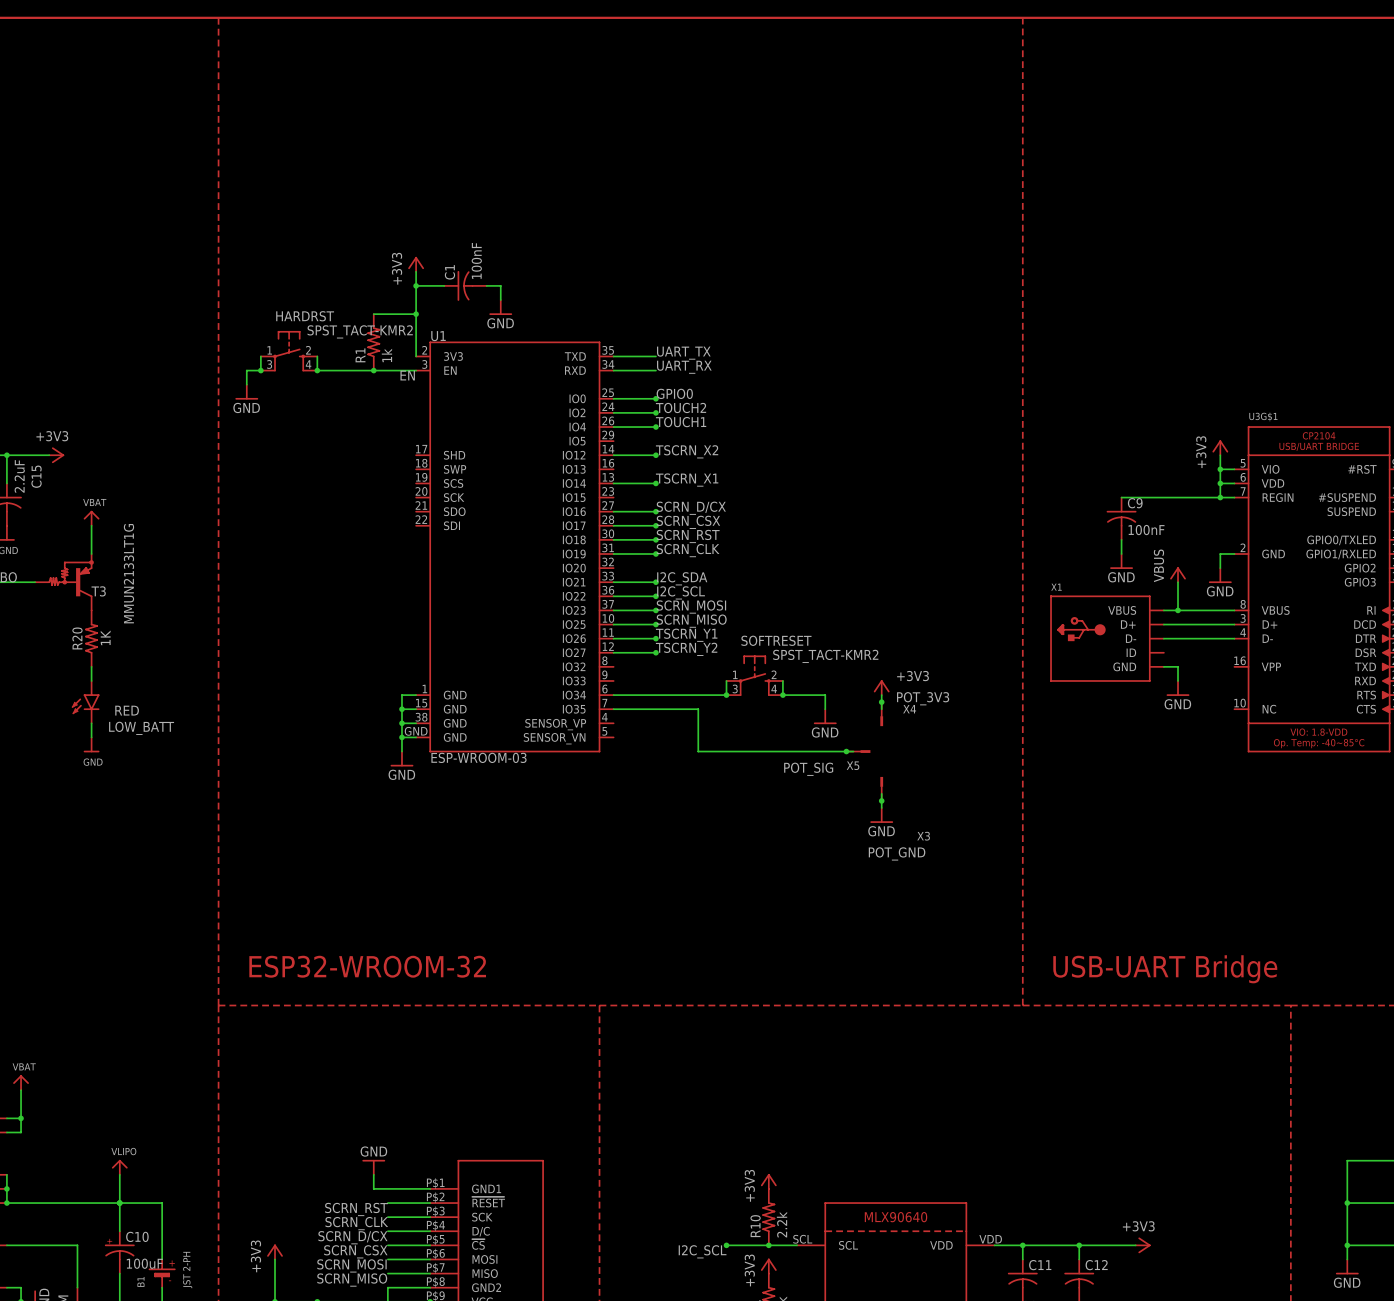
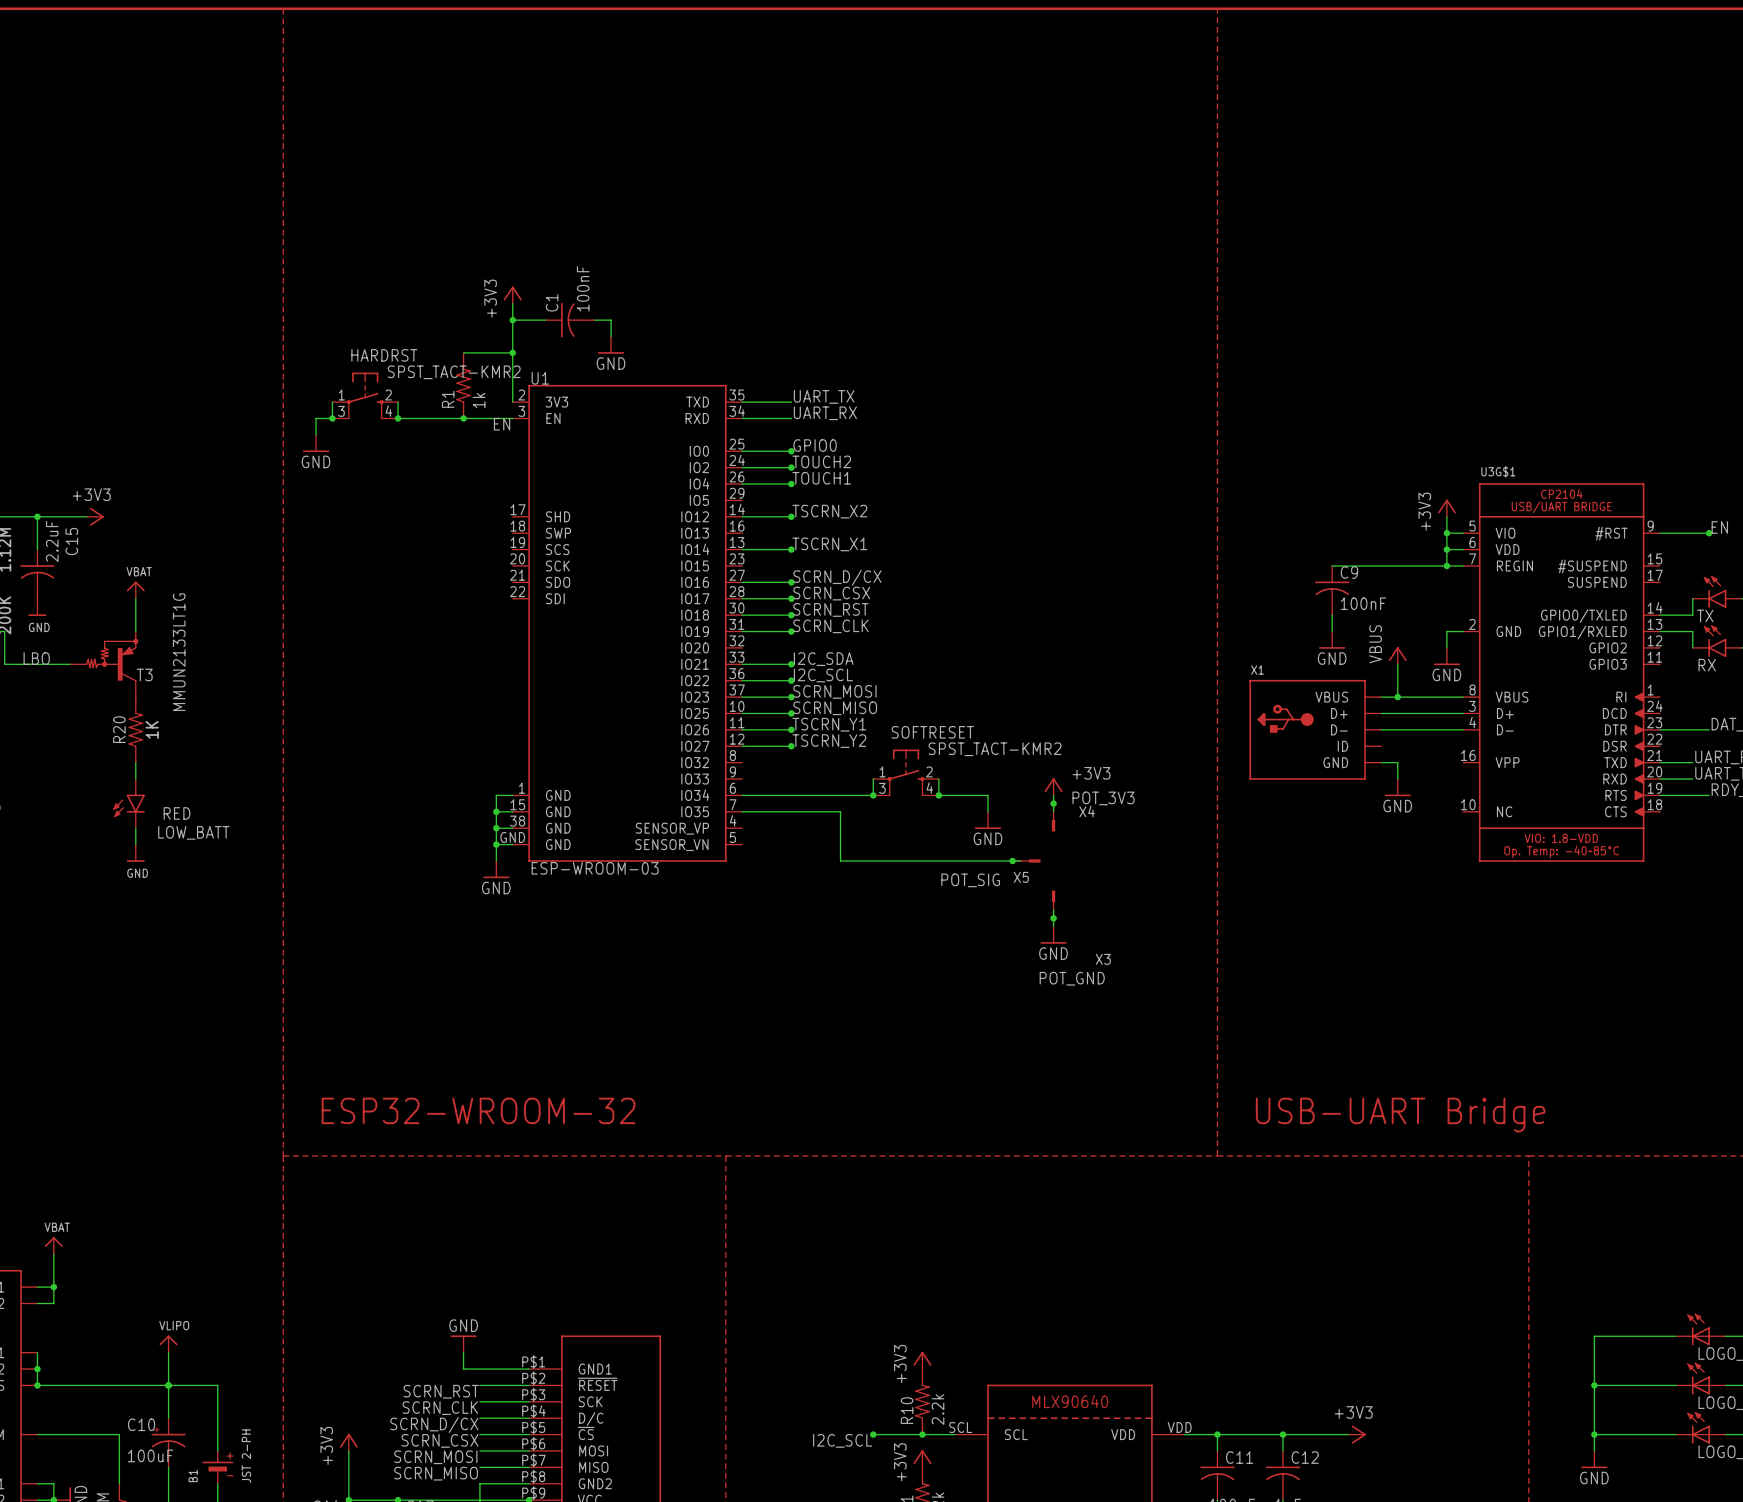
C10 name position: C10 (137, 1236) -> C10 (141, 1424)
C10 value position: 100uF (144, 1263) -> 100uF (150, 1455)

